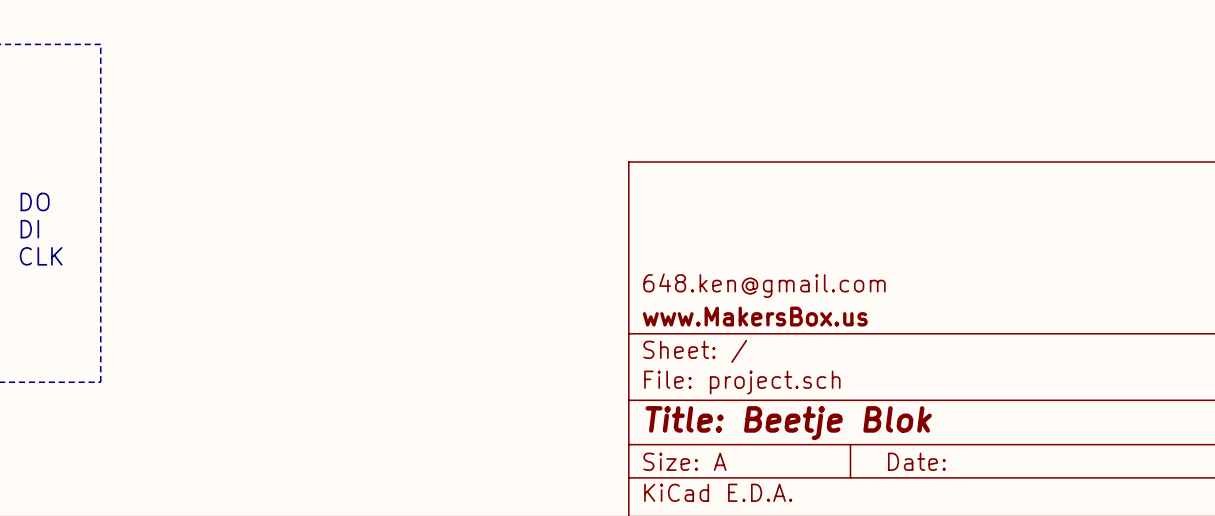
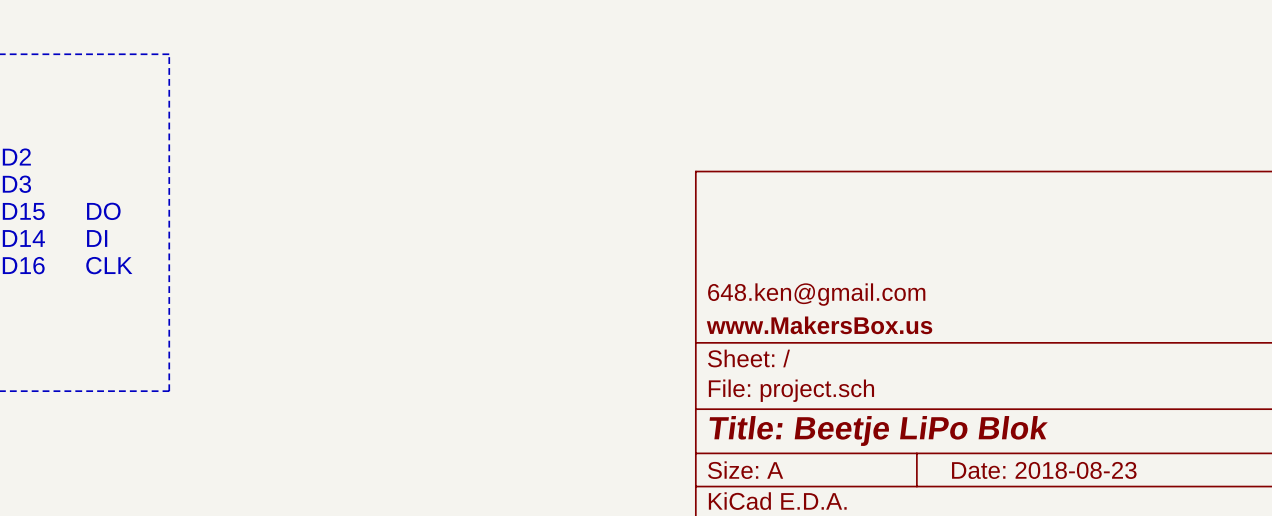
title block: Title: Beetje Blok (788, 423) -> Title: Beetje LiPo Blok (878, 430)
title block: Date: (916, 461) -> Date: 2018-08-23 (1044, 470)

